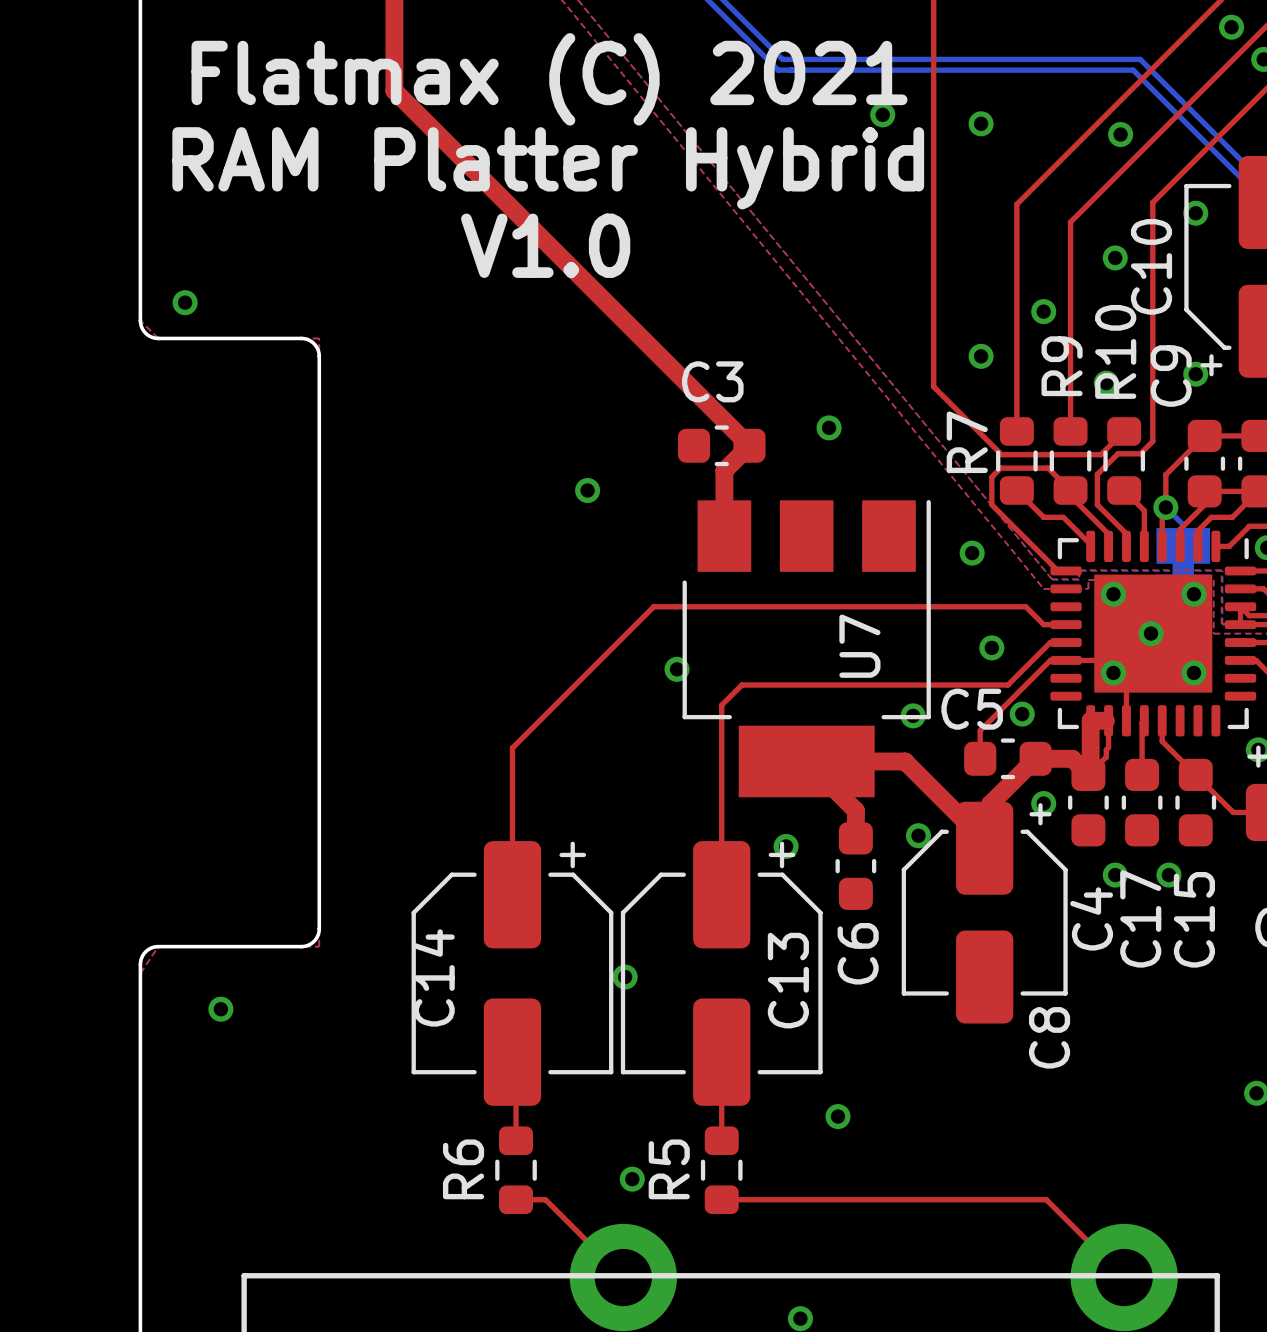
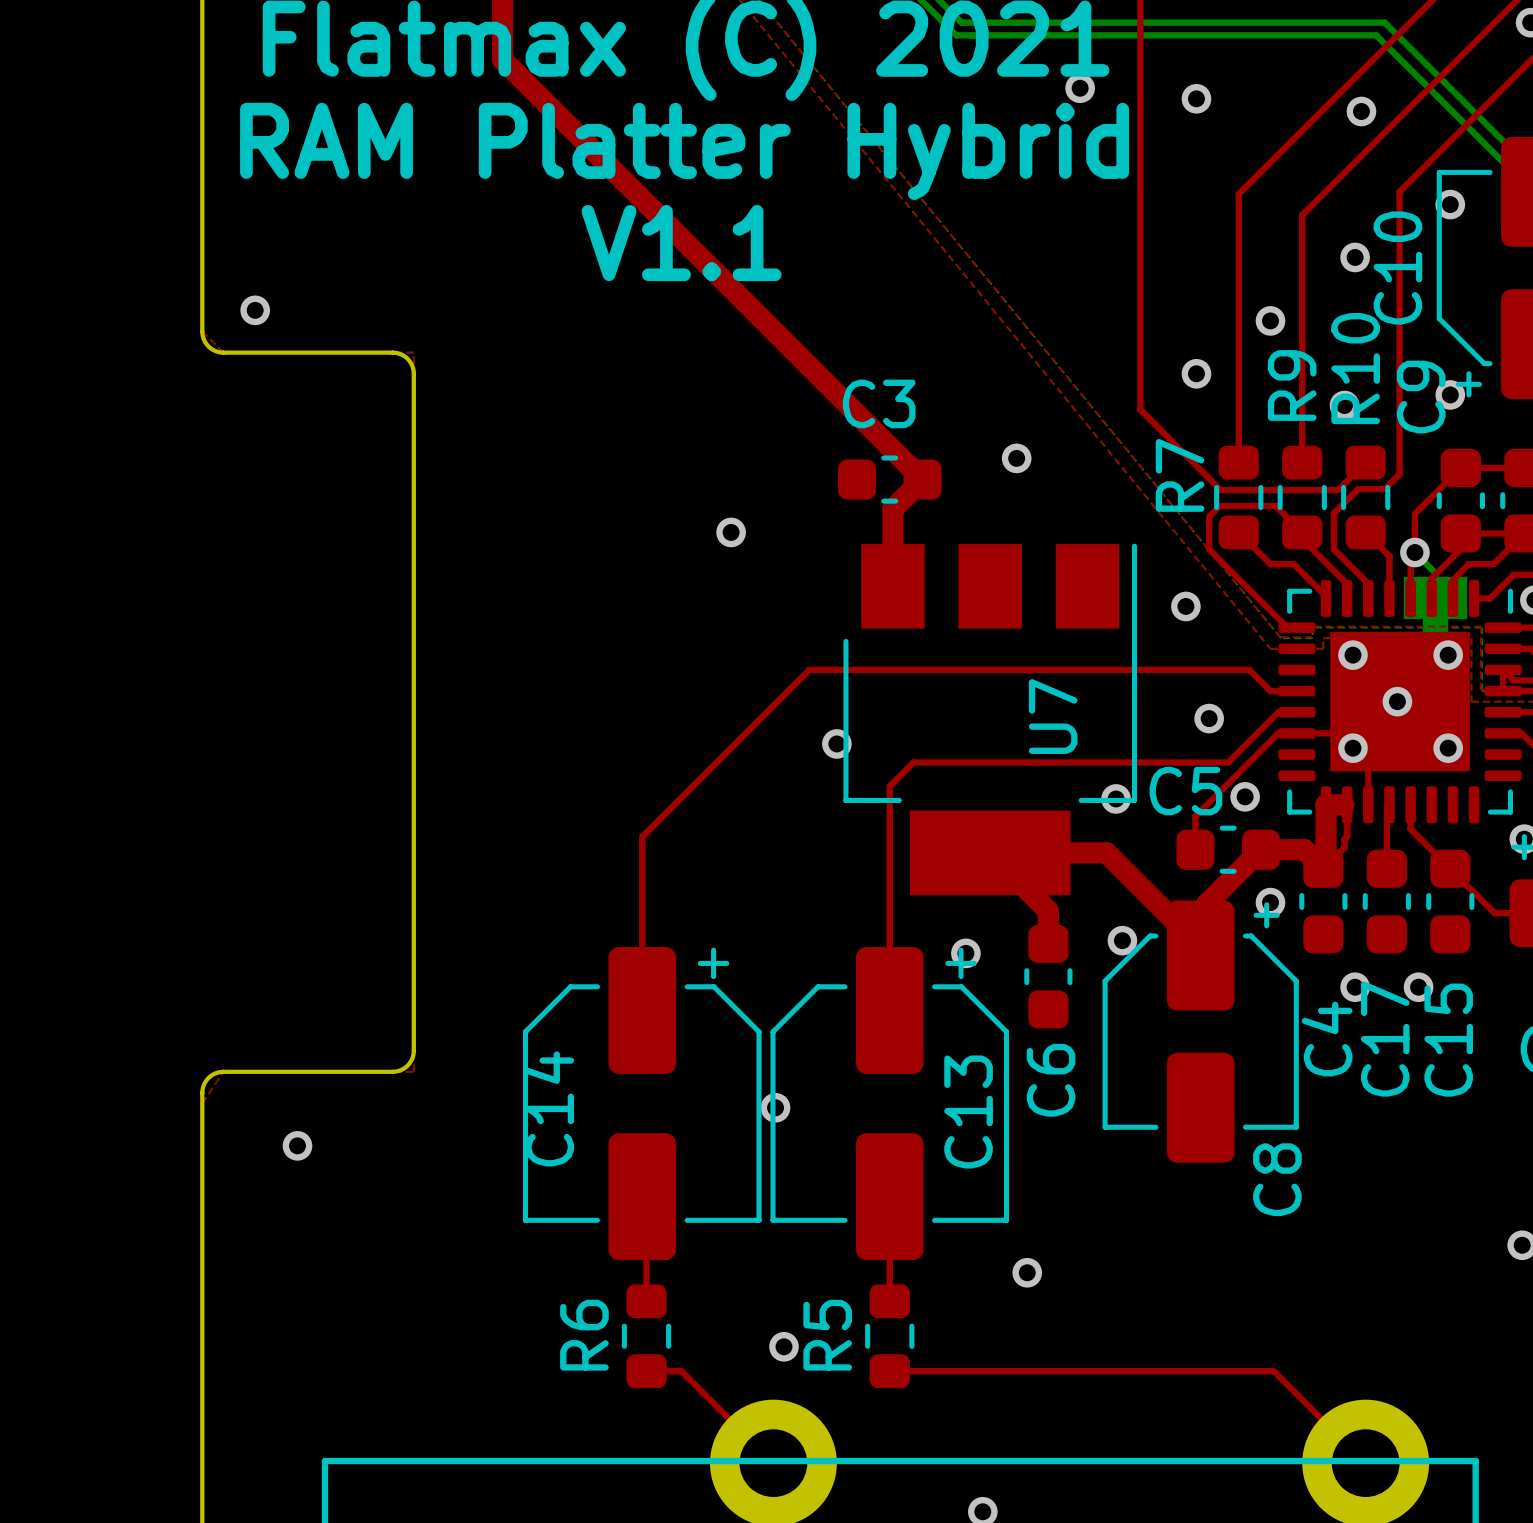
text: V1.0 (545, 245) -> V1.1 (681, 243)

